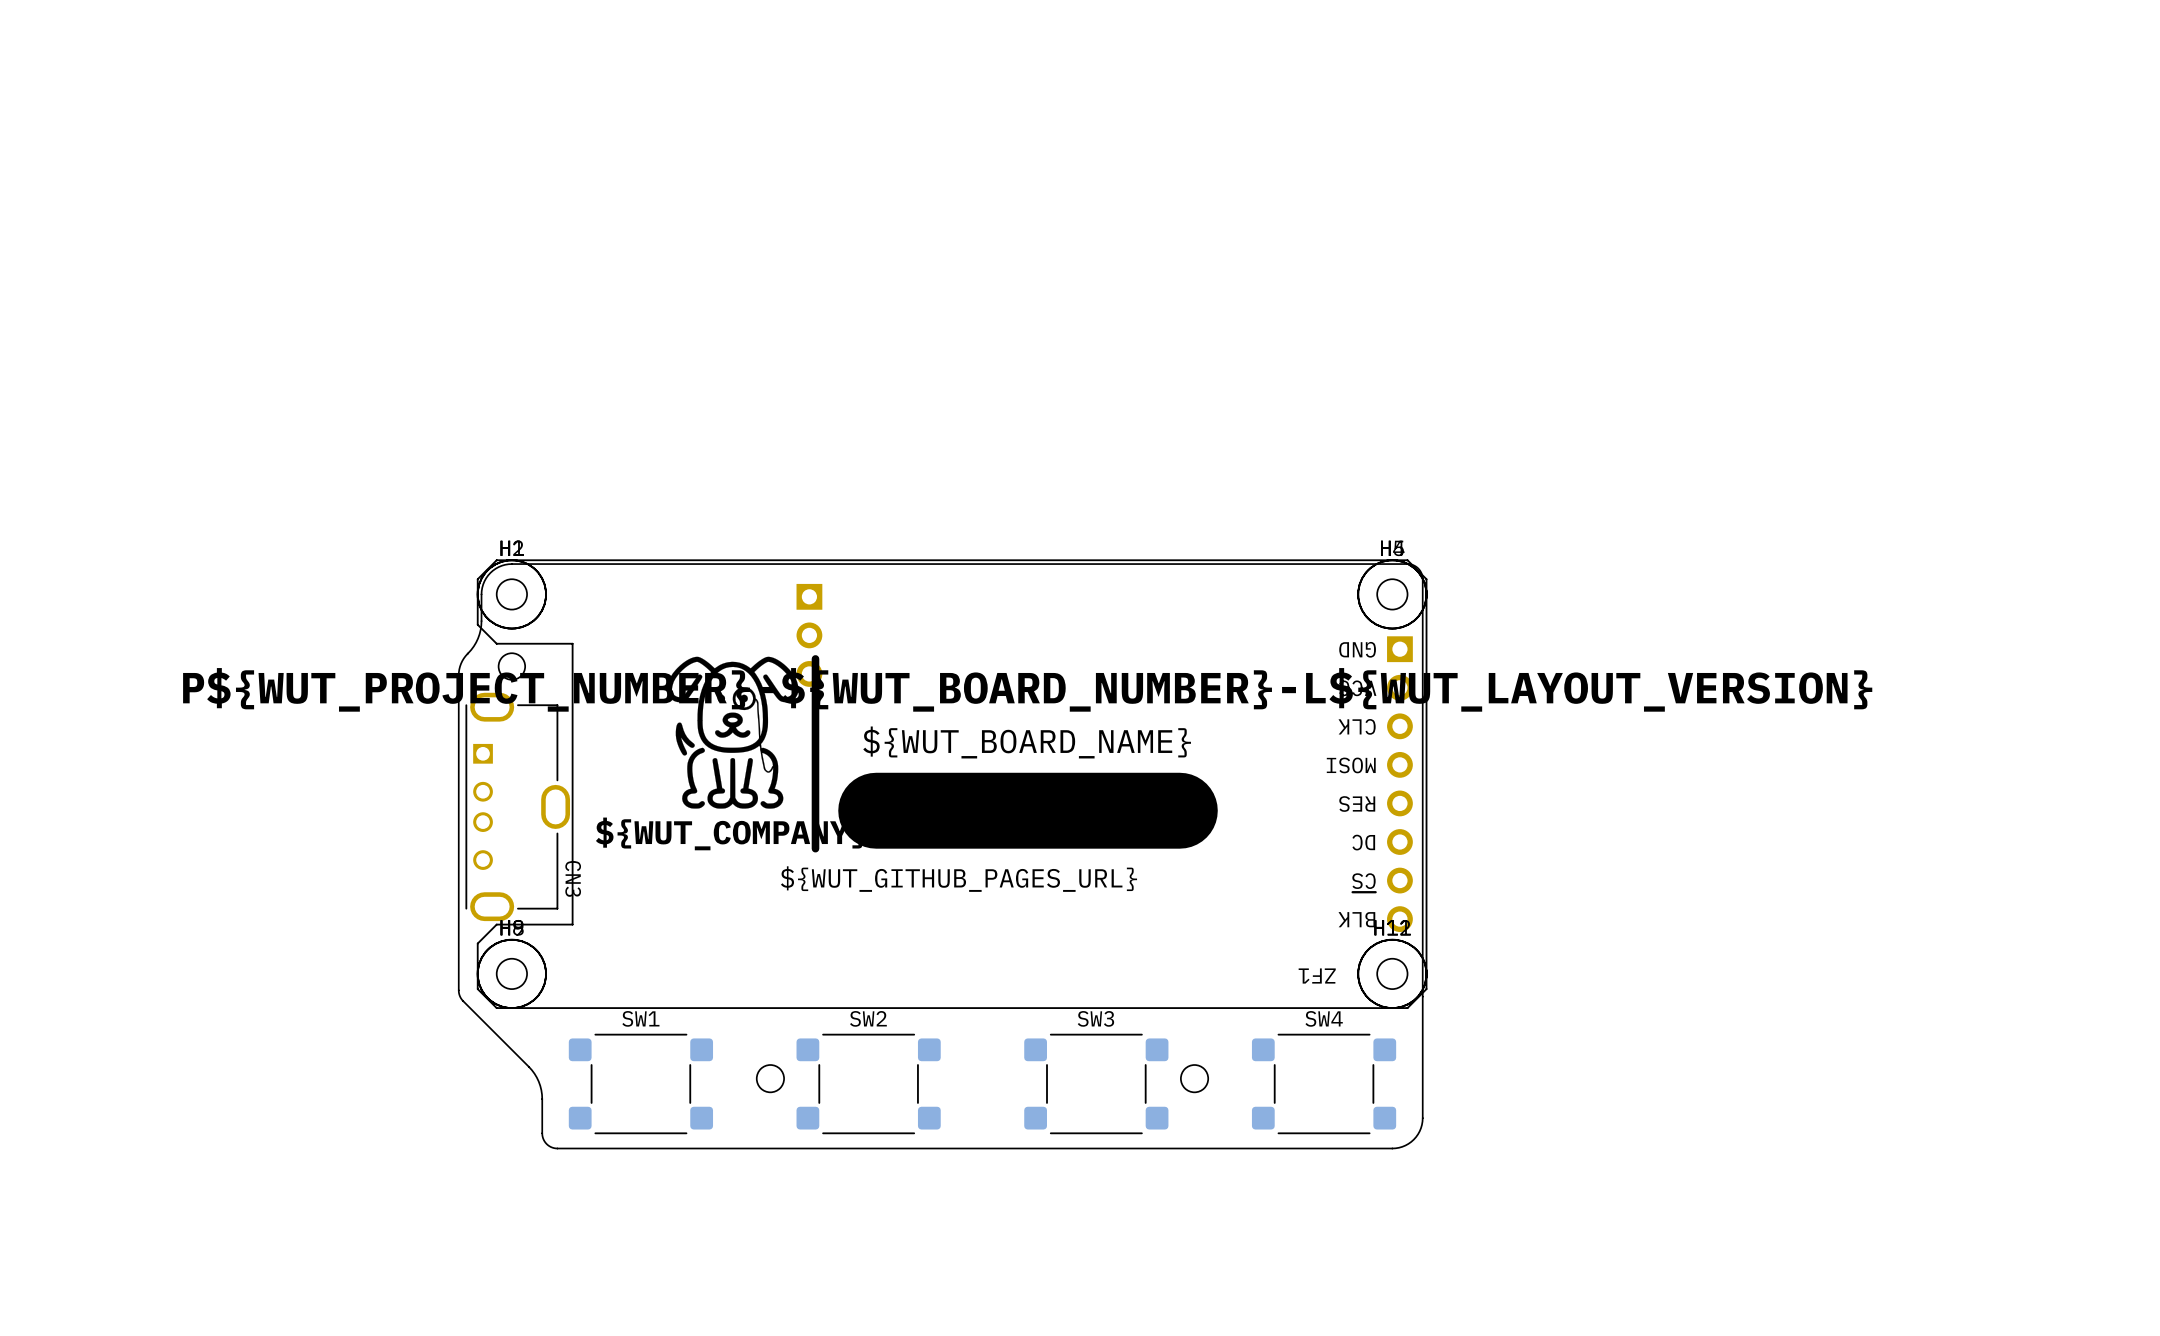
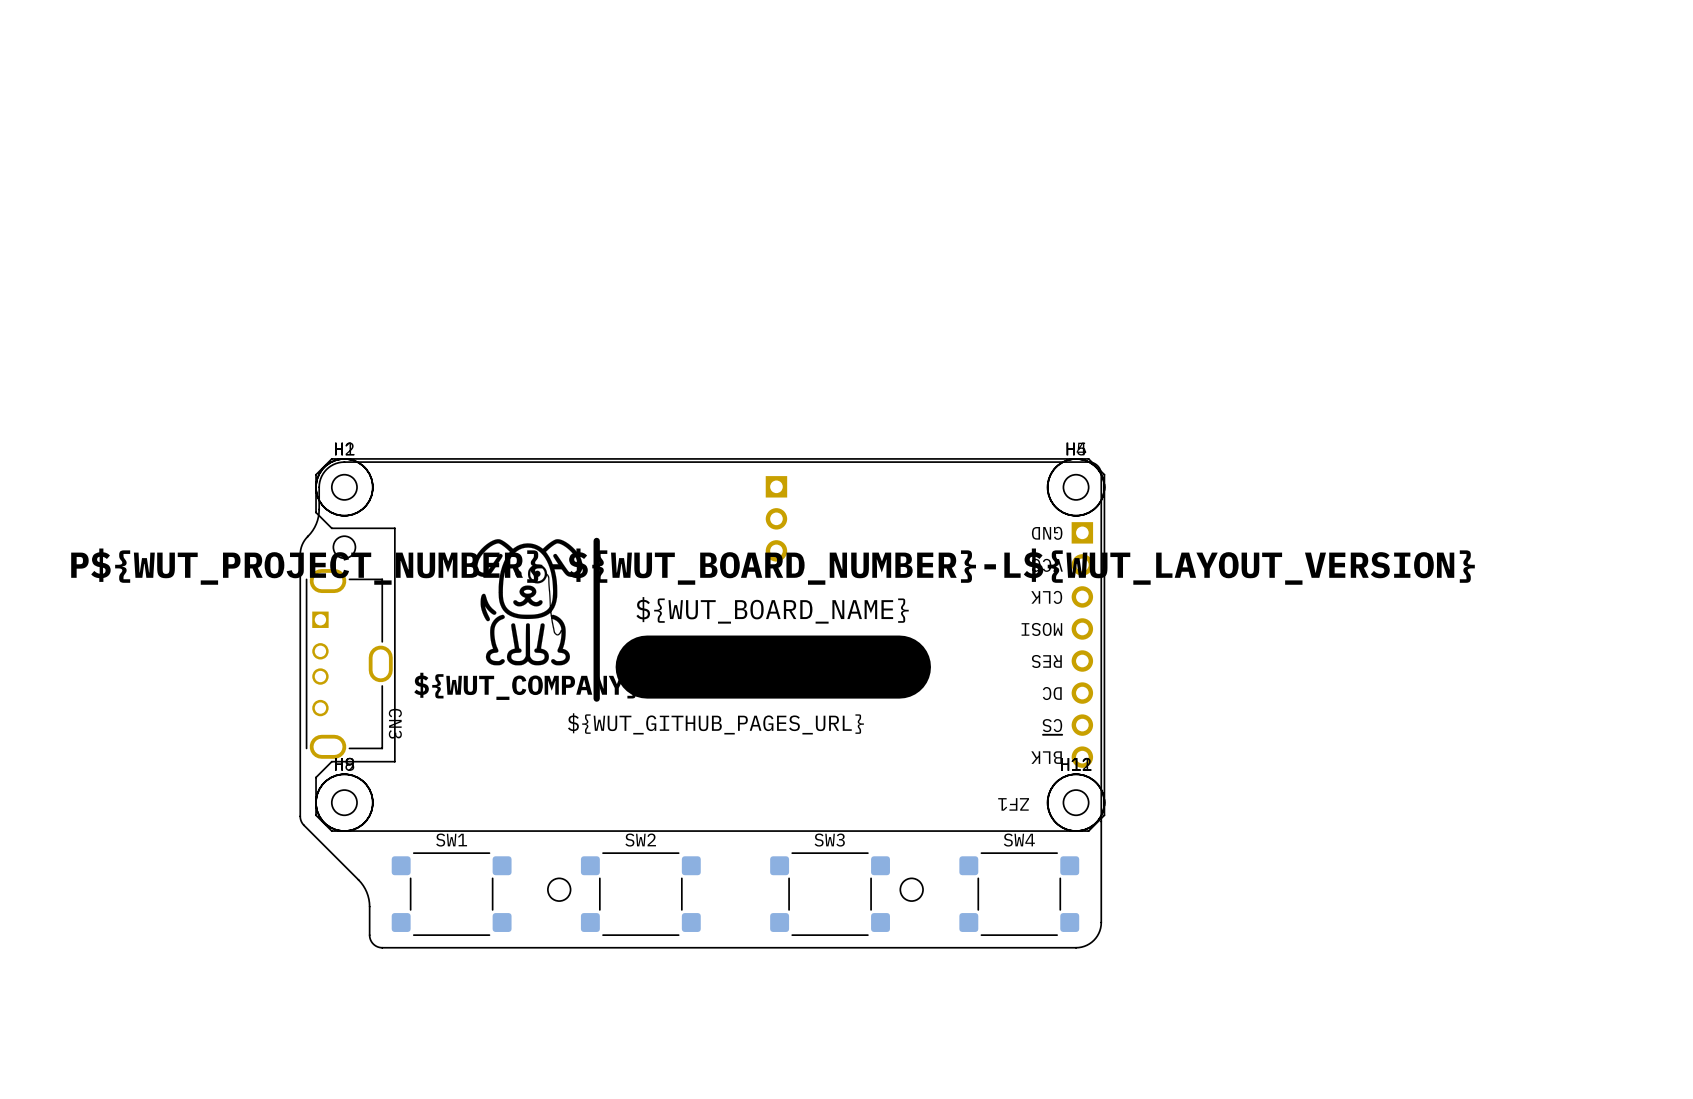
part position: (809, 635) -> (776, 518)

